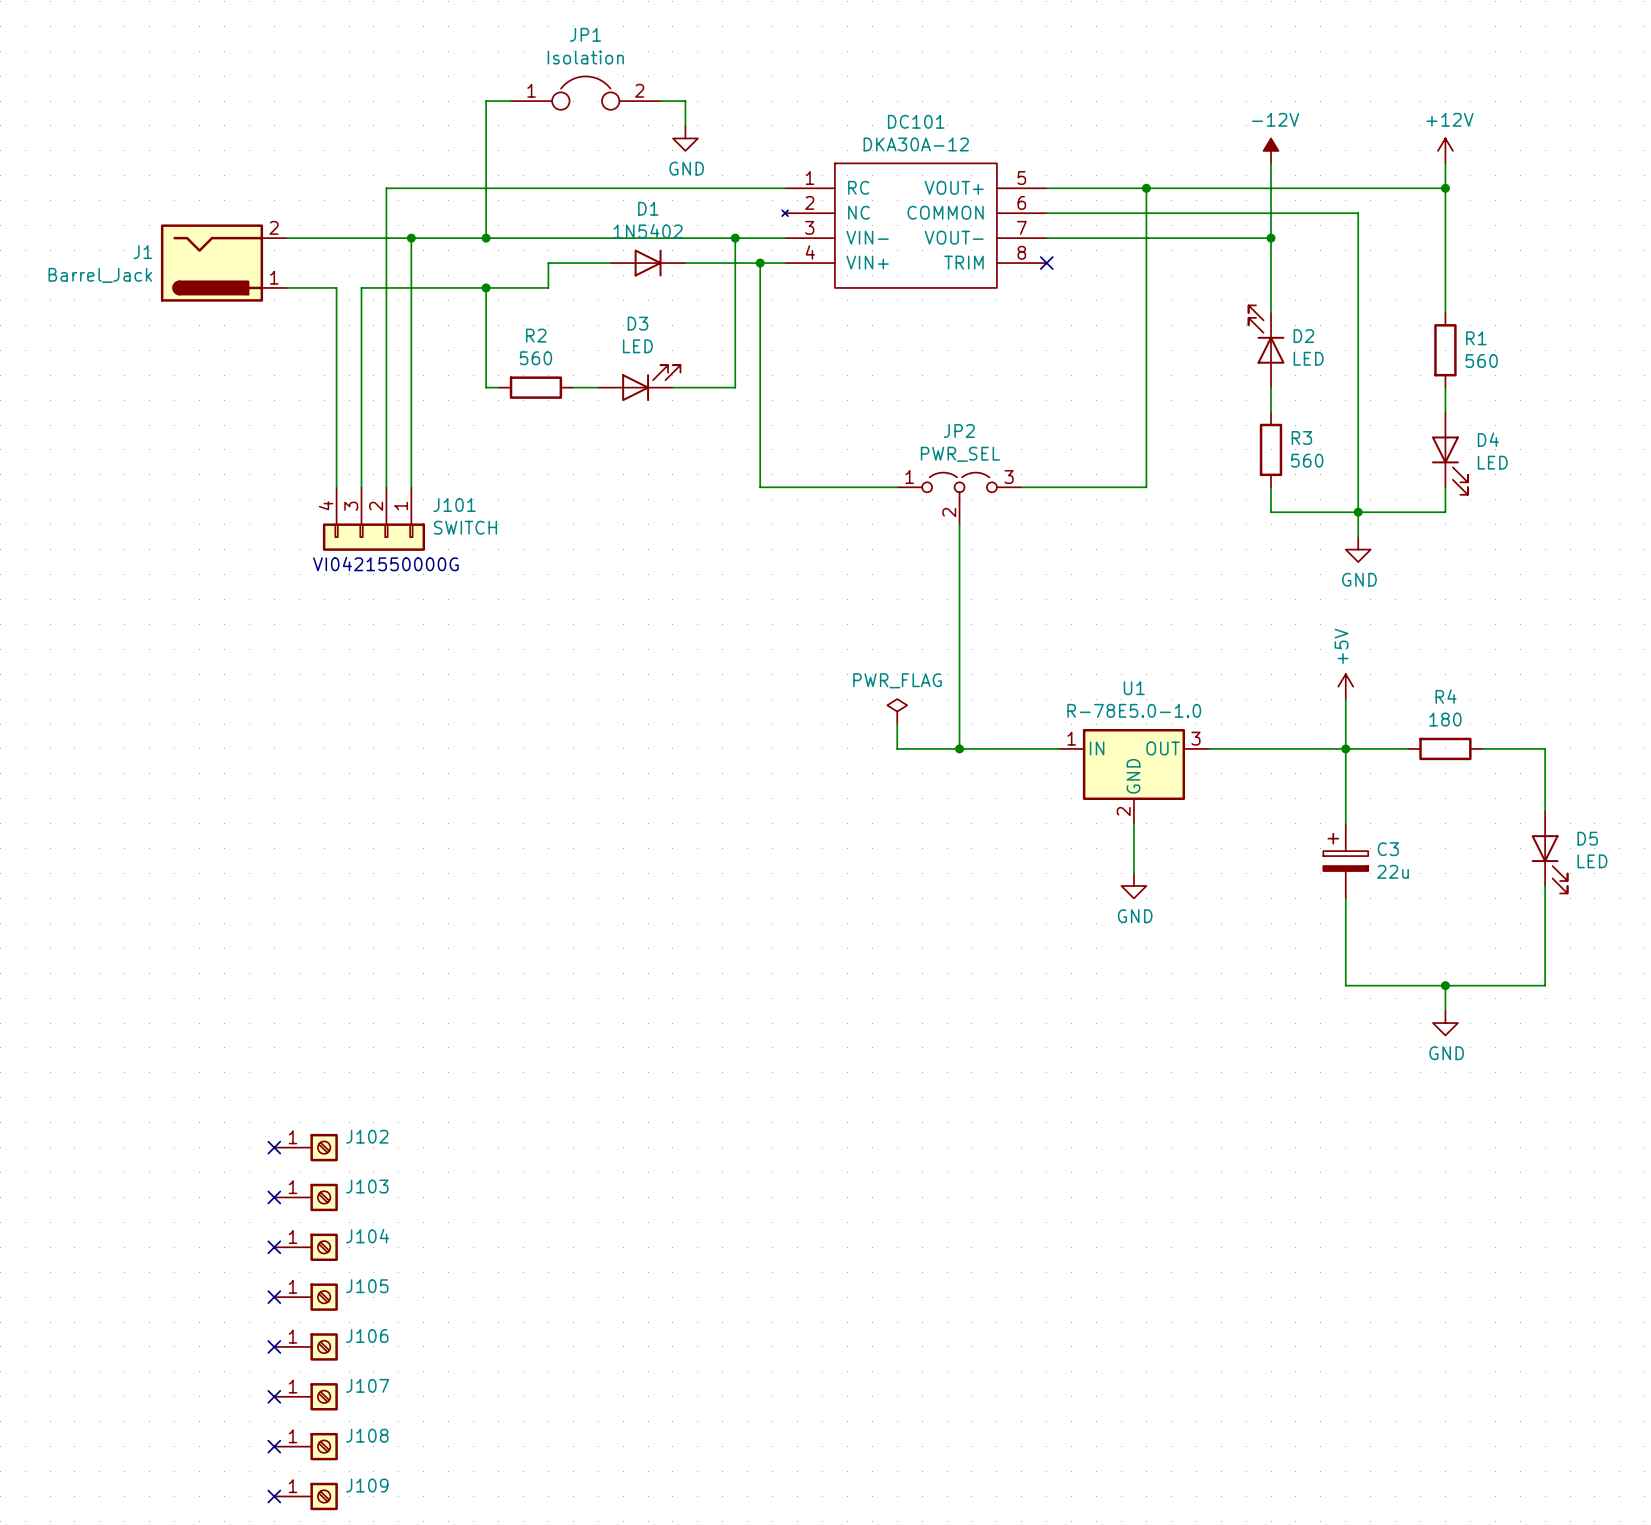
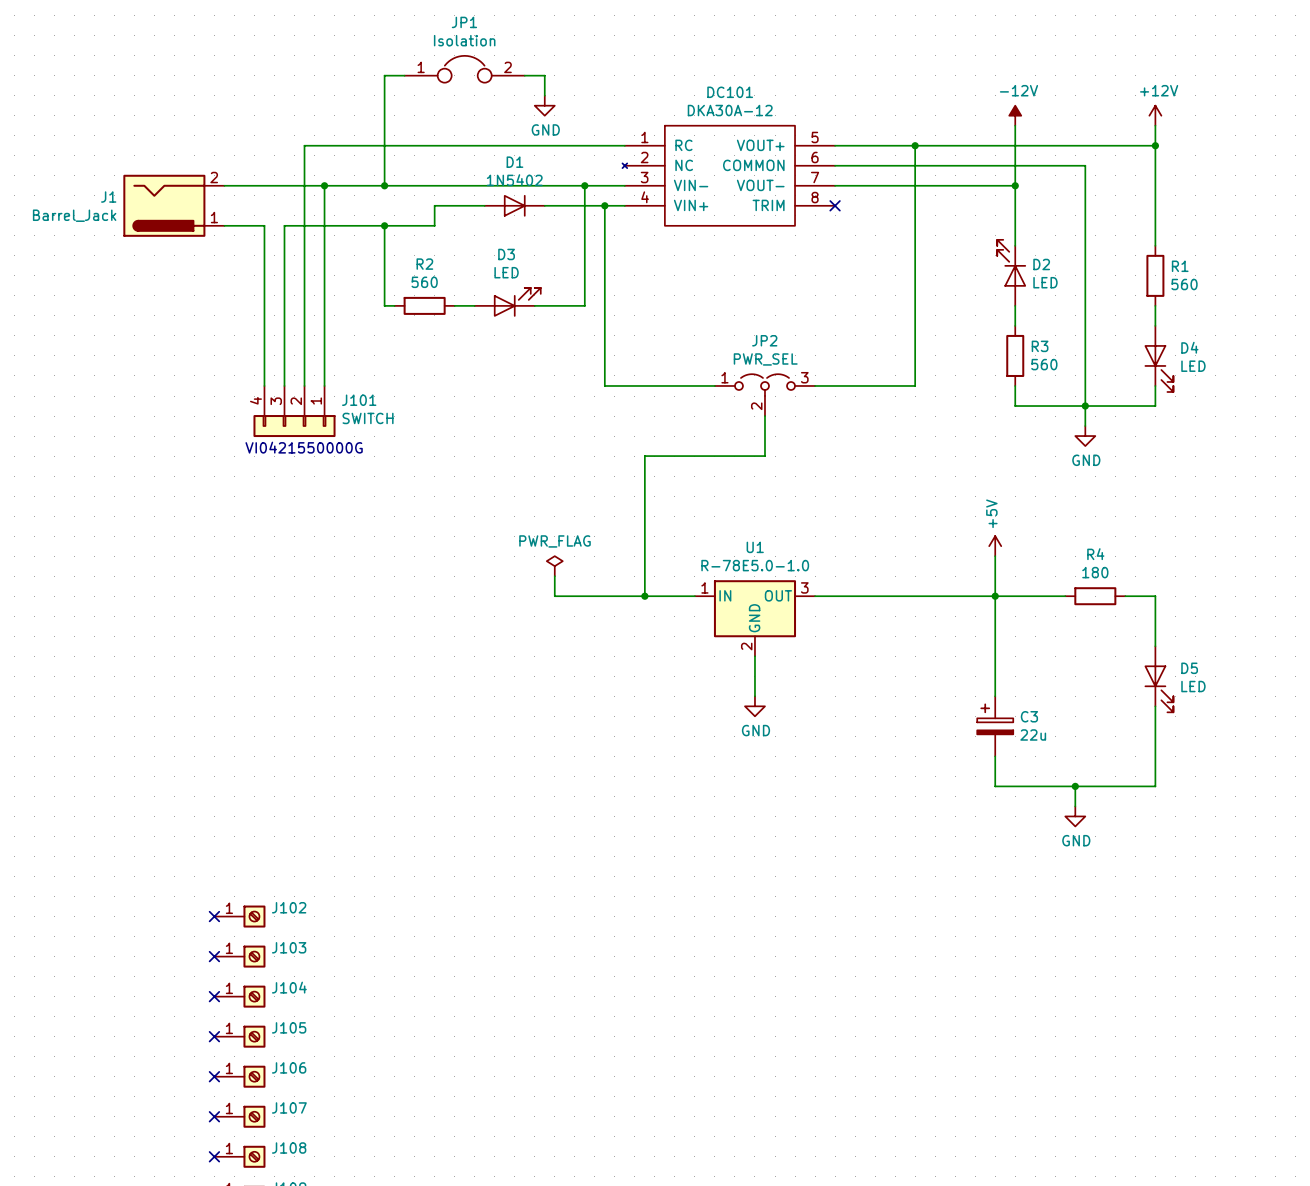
wire: (959, 574) (959, 748) -> (764, 456) (644, 456) (644, 596)
power symbol position: +5V (1345, 686) -> +5V (995, 546)
wire: none -> (995, 556) (995, 696)
wire: (1345, 699) (1345, 823) -> none
power symbol position: PWR_FLAG (897, 711) -> PWR_FLAG (554, 566)
wire: none -> (554, 576) (554, 596) (694, 596)
junction: none -> (644, 596)
junction: (959, 748) -> none
junction: none -> (995, 596)
wire: (1333, 748) (1408, 748) -> (1155, 646) (1155, 596) (1125, 596)
junction: (1345, 748) -> none
R4 position: (1445, 748) -> (1095, 596)
wire: (1482, 748) (1545, 748) (1545, 811) -> none
U1 position: (1133, 776) -> (754, 618)
wire: (1133, 823) (1133, 873) -> (754, 656) (754, 696)
D5 position: (1549, 852) -> (1159, 679)
C3 position: (1345, 861) -> (995, 726)
power symbol: none -> GND (754, 706)
power symbol: GND (1133, 885) -> none
wire: none -> (1155, 706) (1155, 786)
wire: (1545, 885) (1545, 985) (1445, 985) (1445, 1010) -> none
wire: (1345, 898) (1345, 985) -> none
wire: none -> (995, 756) (995, 786) (1075, 786) (1075, 806)
junction: none -> (1075, 786)
junction: (1445, 985) -> none
power symbol position: GND (1445, 1023) -> GND (1075, 816)

